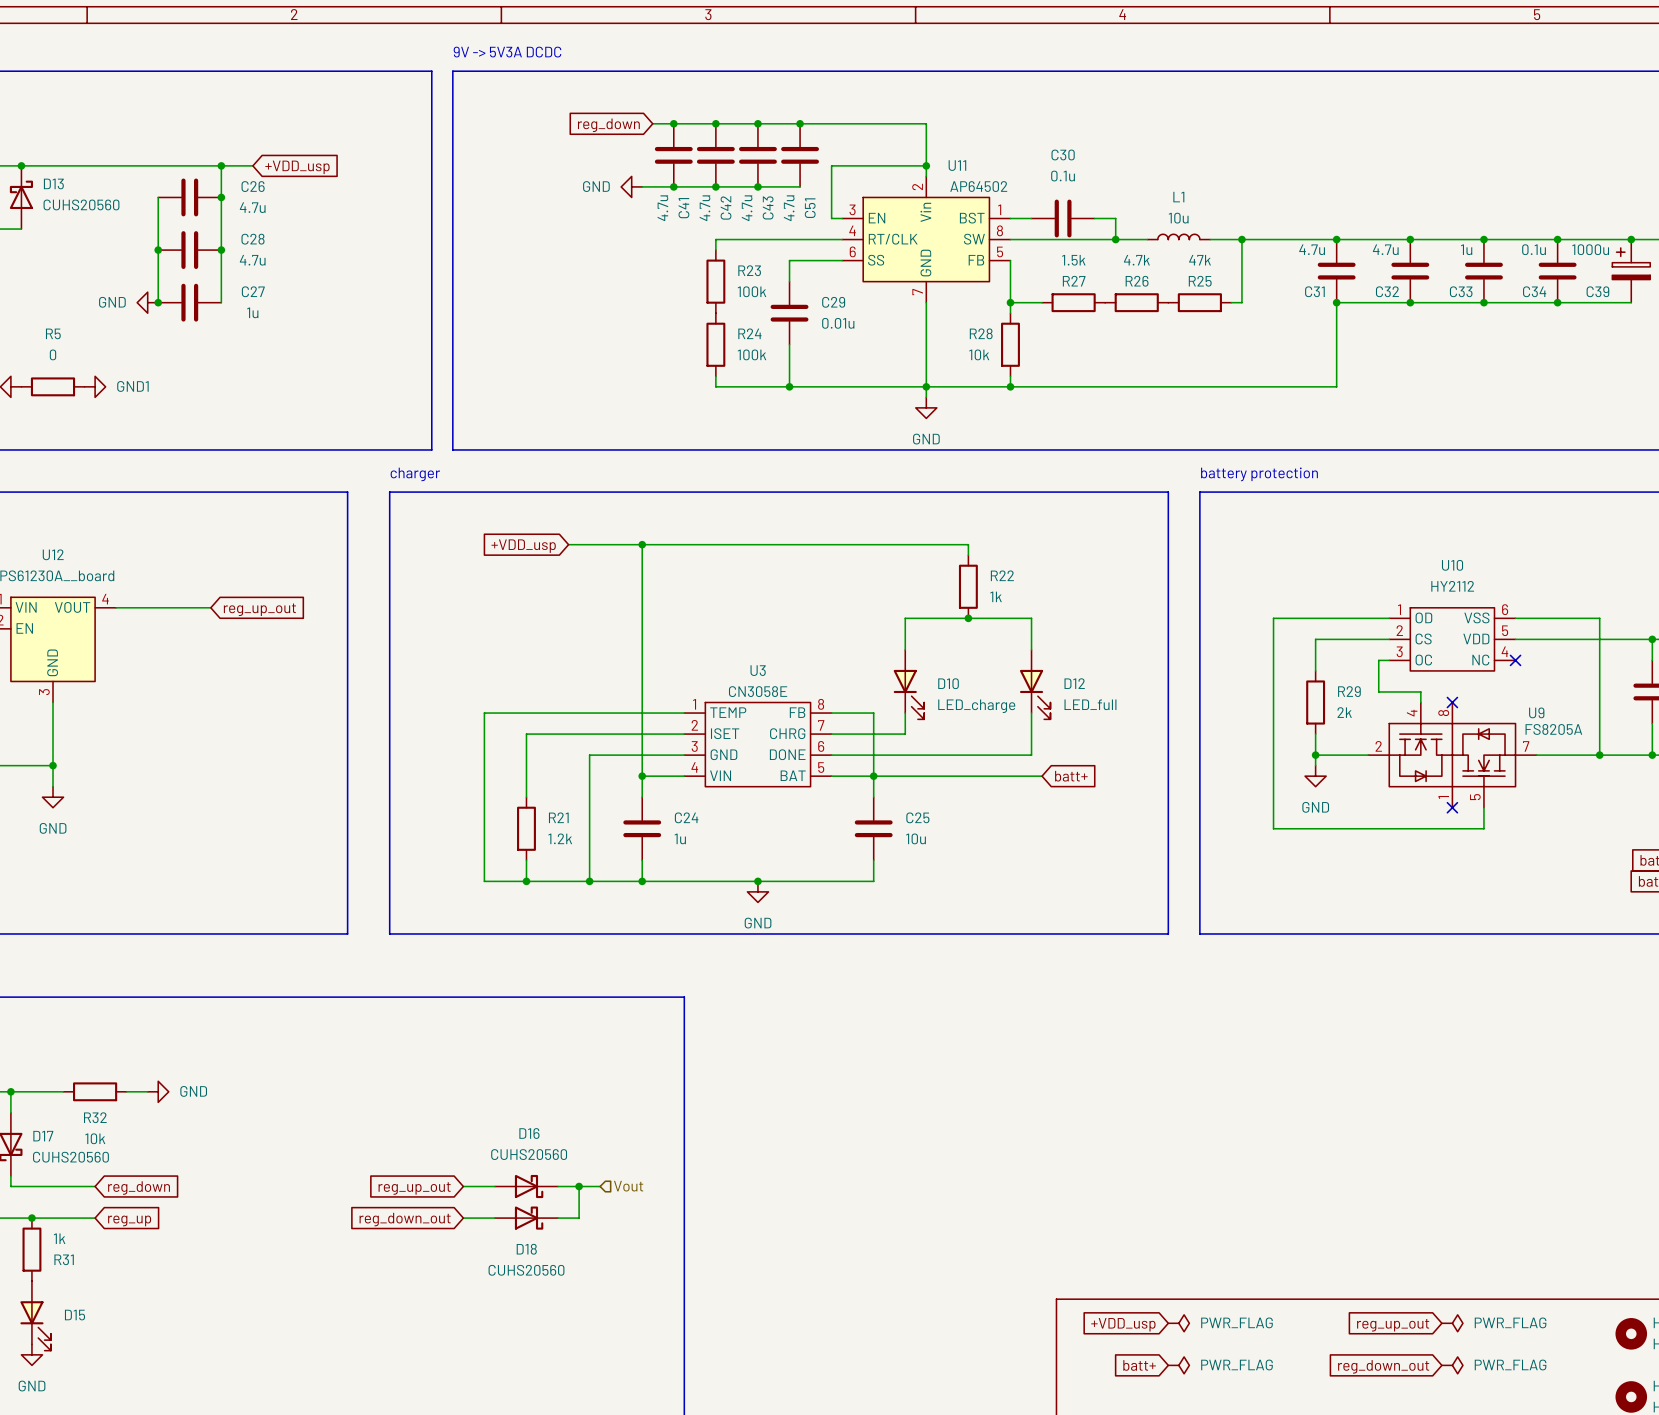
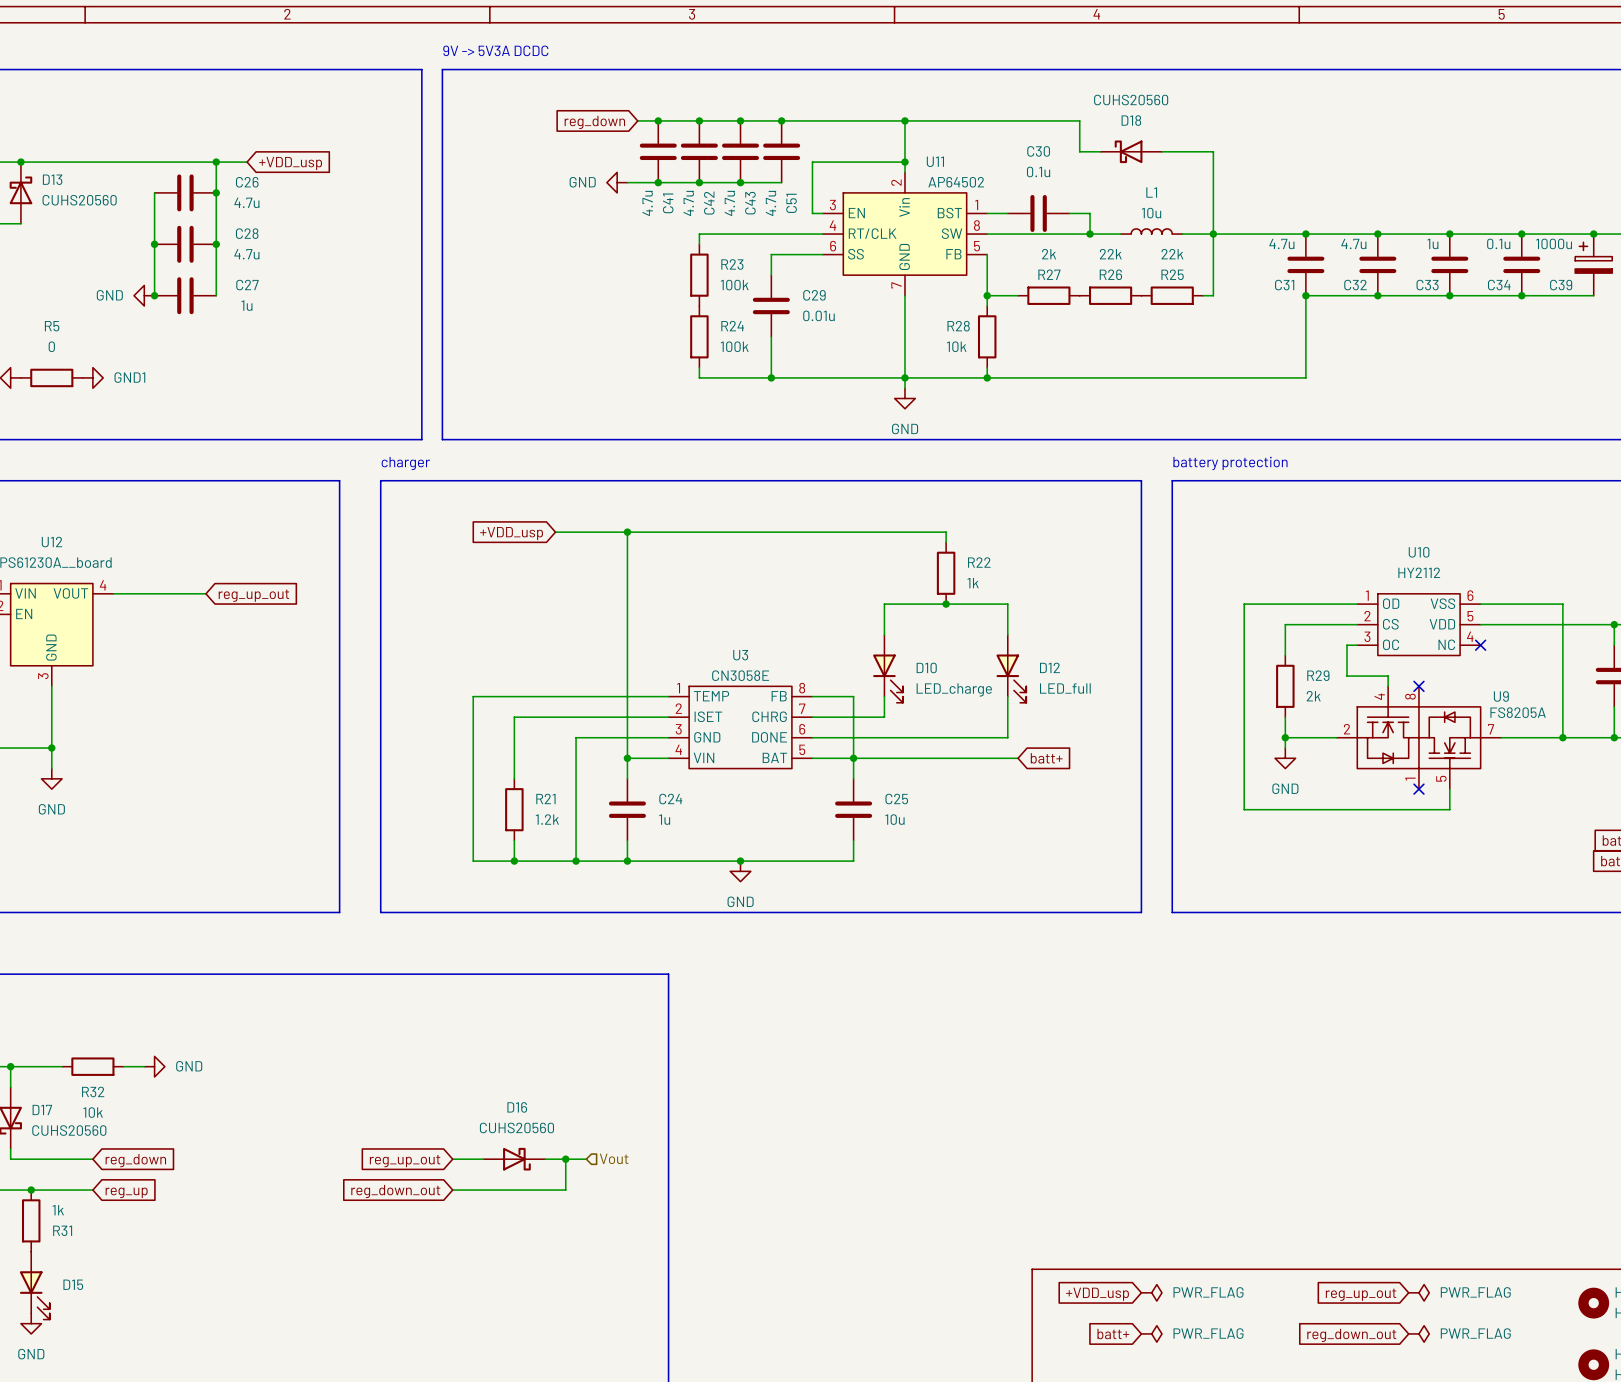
wire: none -> (904, 120) (1079, 120) (1079, 151) (1100, 151)
junction: none -> (904, 120)
wire: none -> (1161, 151) (1213, 151) (1213, 234)
R27 value: 1.5k (1073, 260) -> 2k (1049, 254)
R26 value: 4.7k (1136, 260) -> 22k (1110, 254)
R25 value: 47k (1200, 260) -> 22k (1172, 254)
D18 position: (526, 1218) -> (1131, 151)
D18 rotation: 0° (529, 1218) -> 180° (1128, 151)

